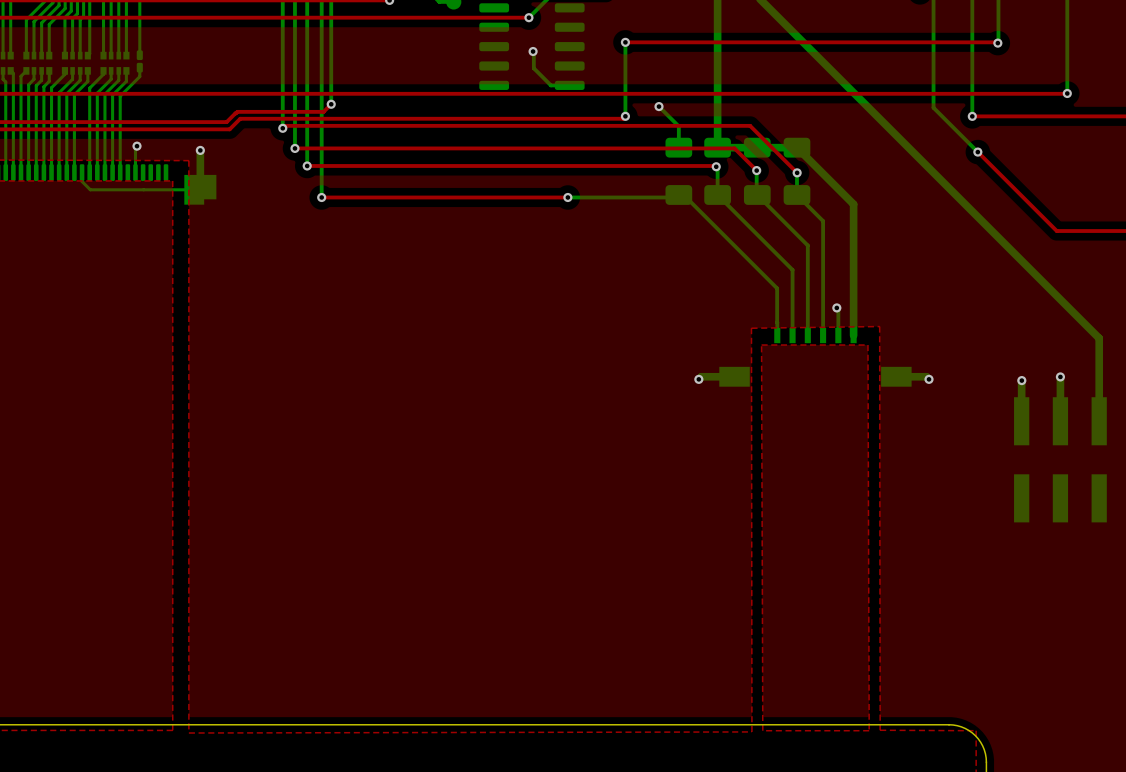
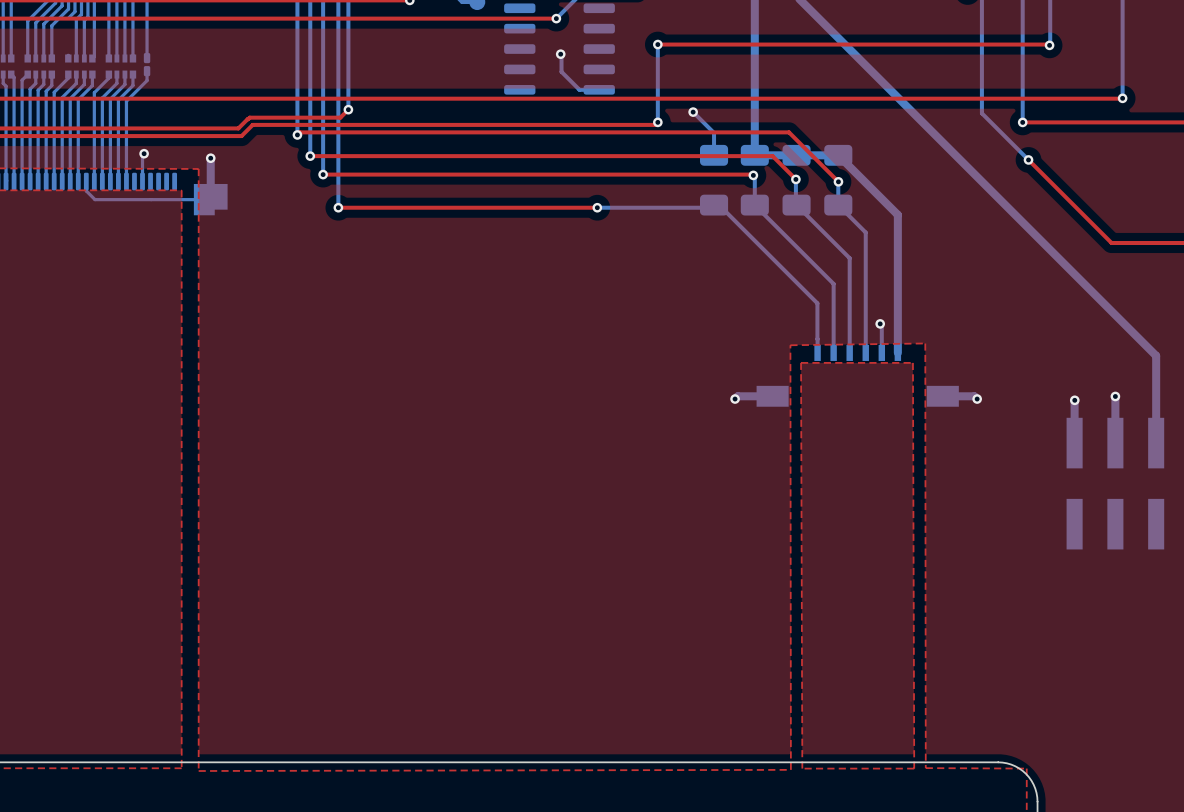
bottom track: (64, 17) (64, 52) -> none

